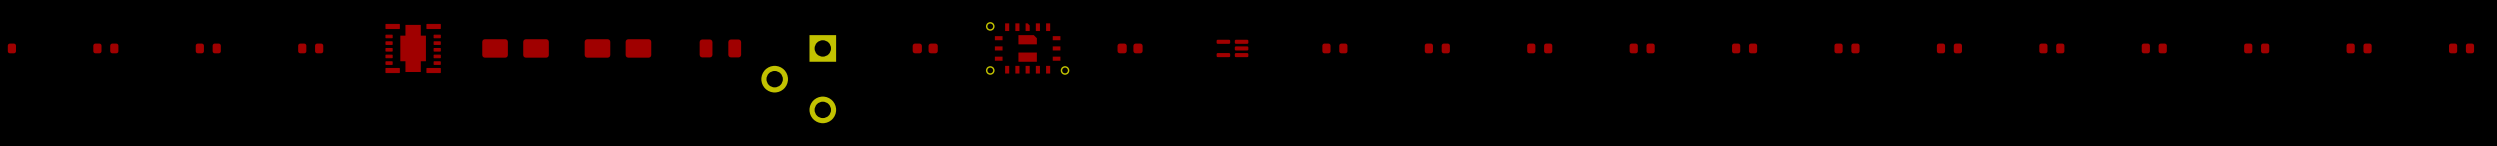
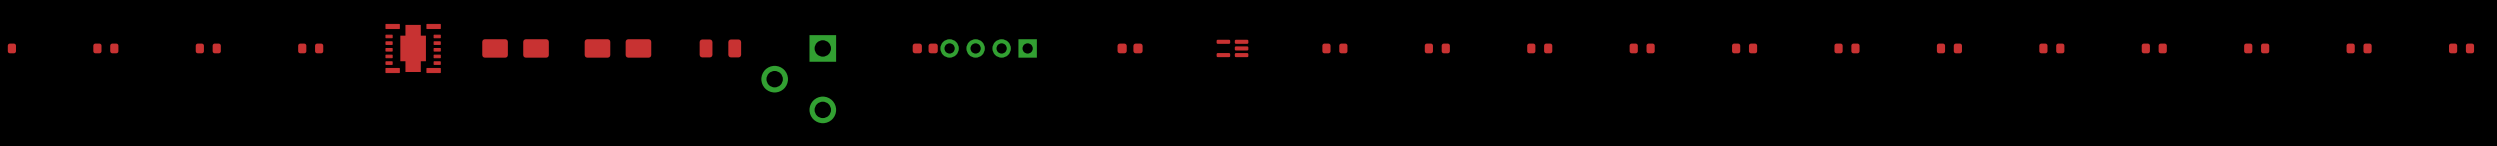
part: none -> (988, 48)
part: (1027, 48) -> none

